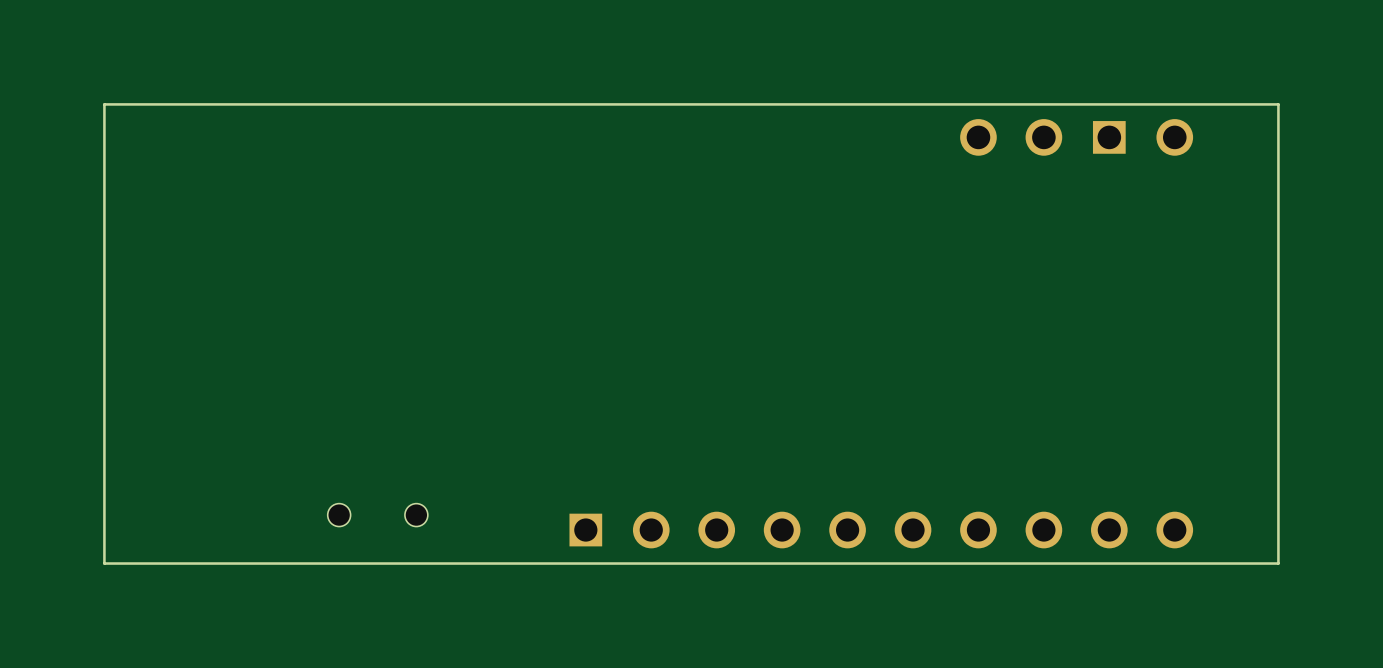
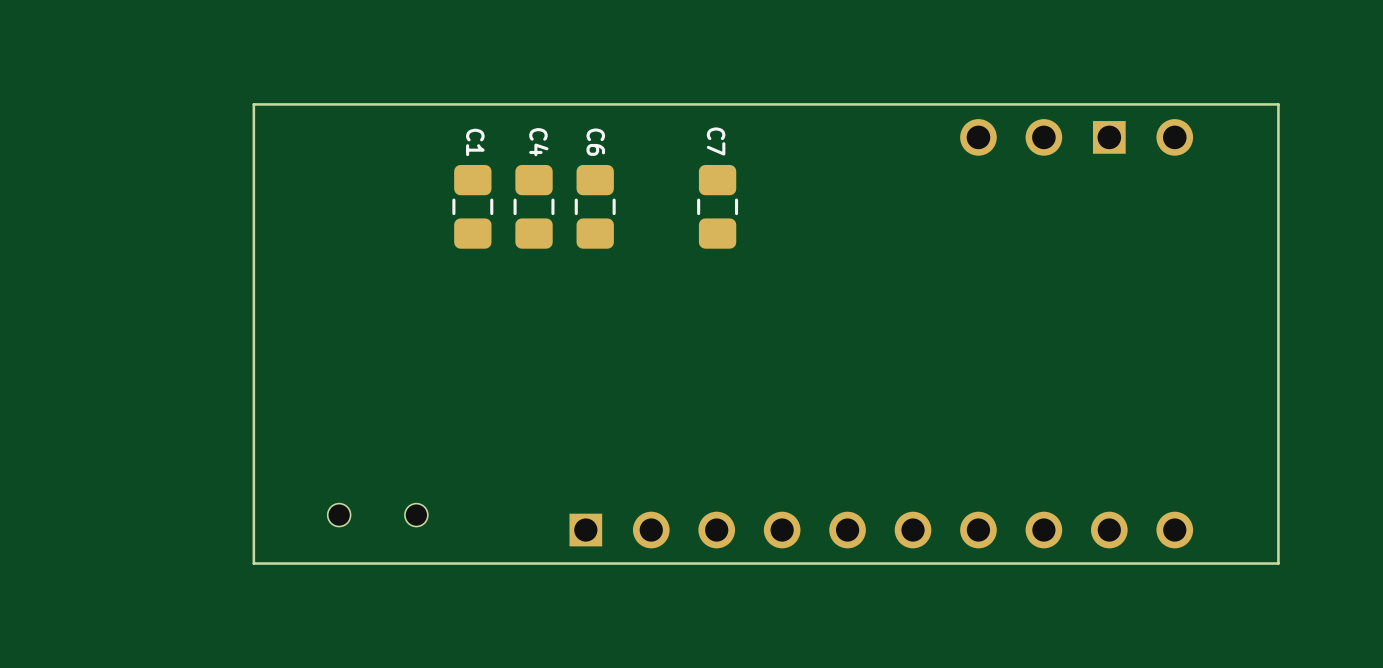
board edge: (253, 104) (104, 104) (104, 563) (253, 563) -> (253, 104) (253, 563)
C1: none -> (472, 206)
C4: none -> (534, 206)
C6: none -> (595, 206)
C7: none -> (717, 206)

